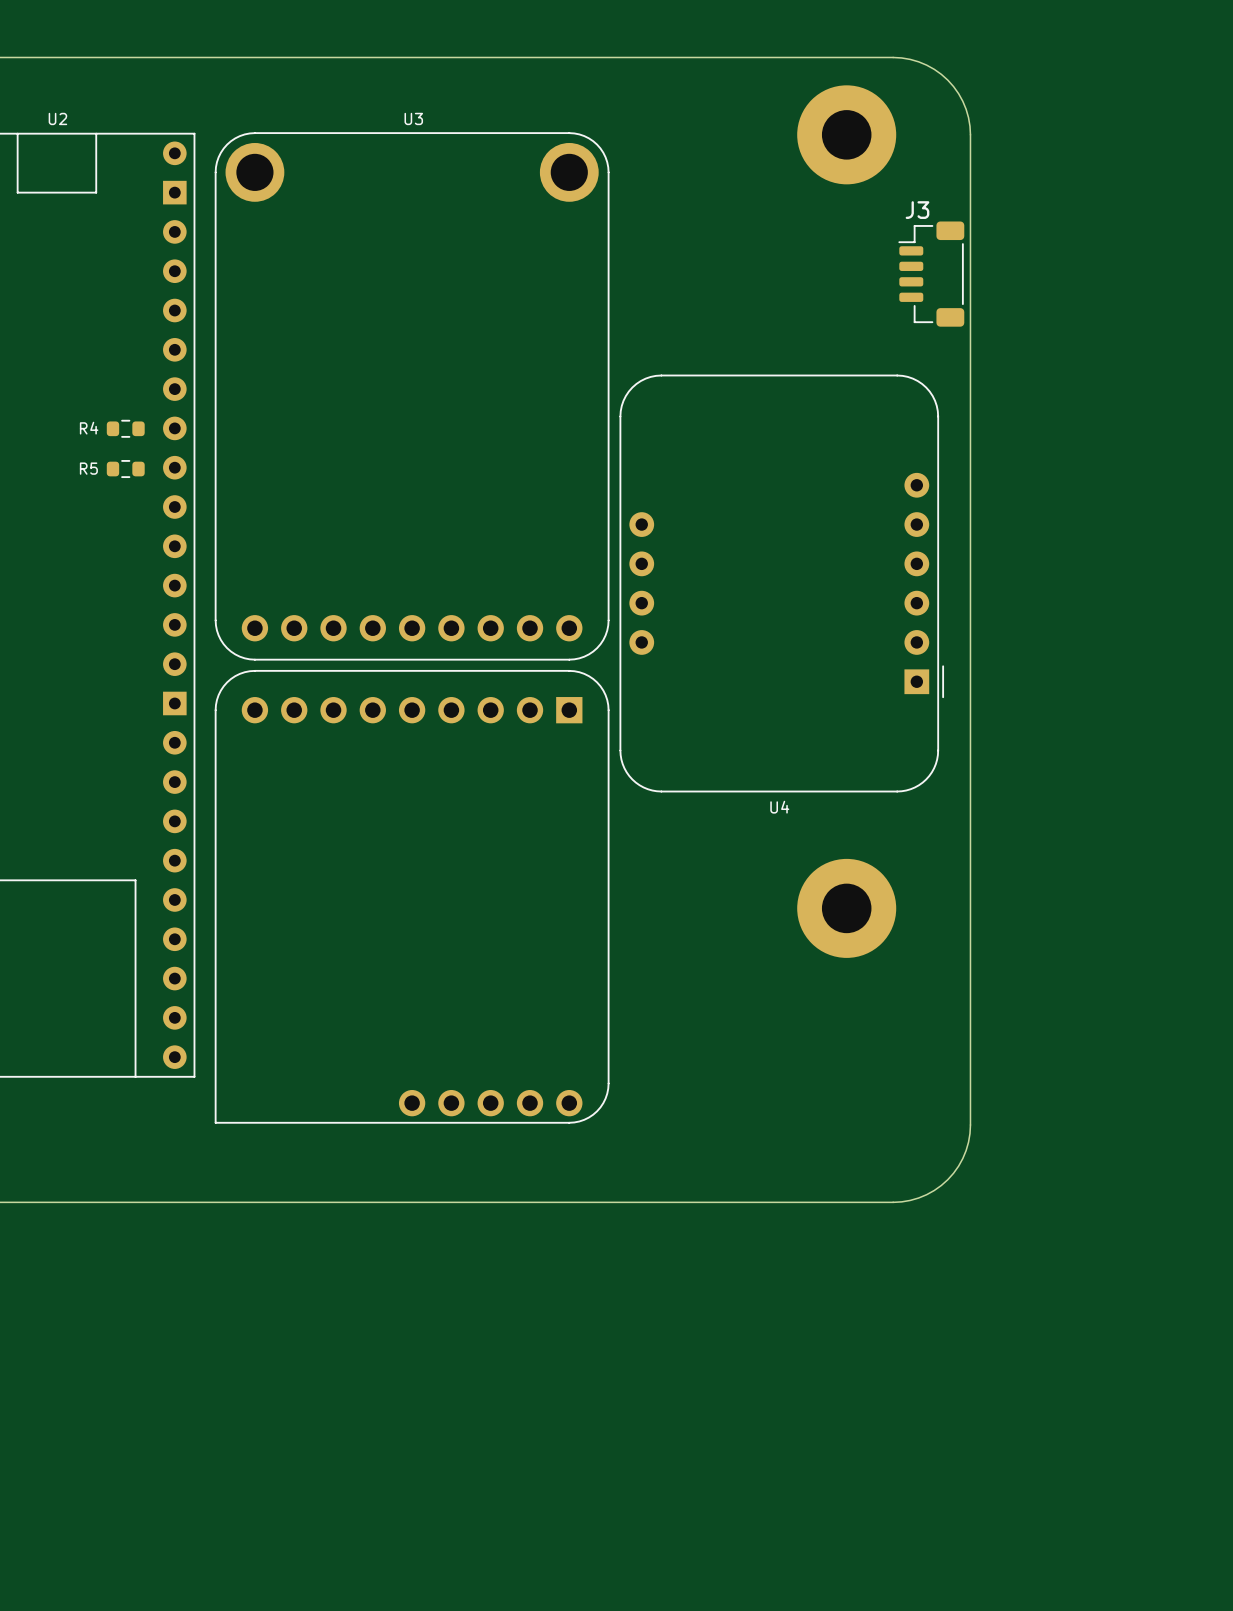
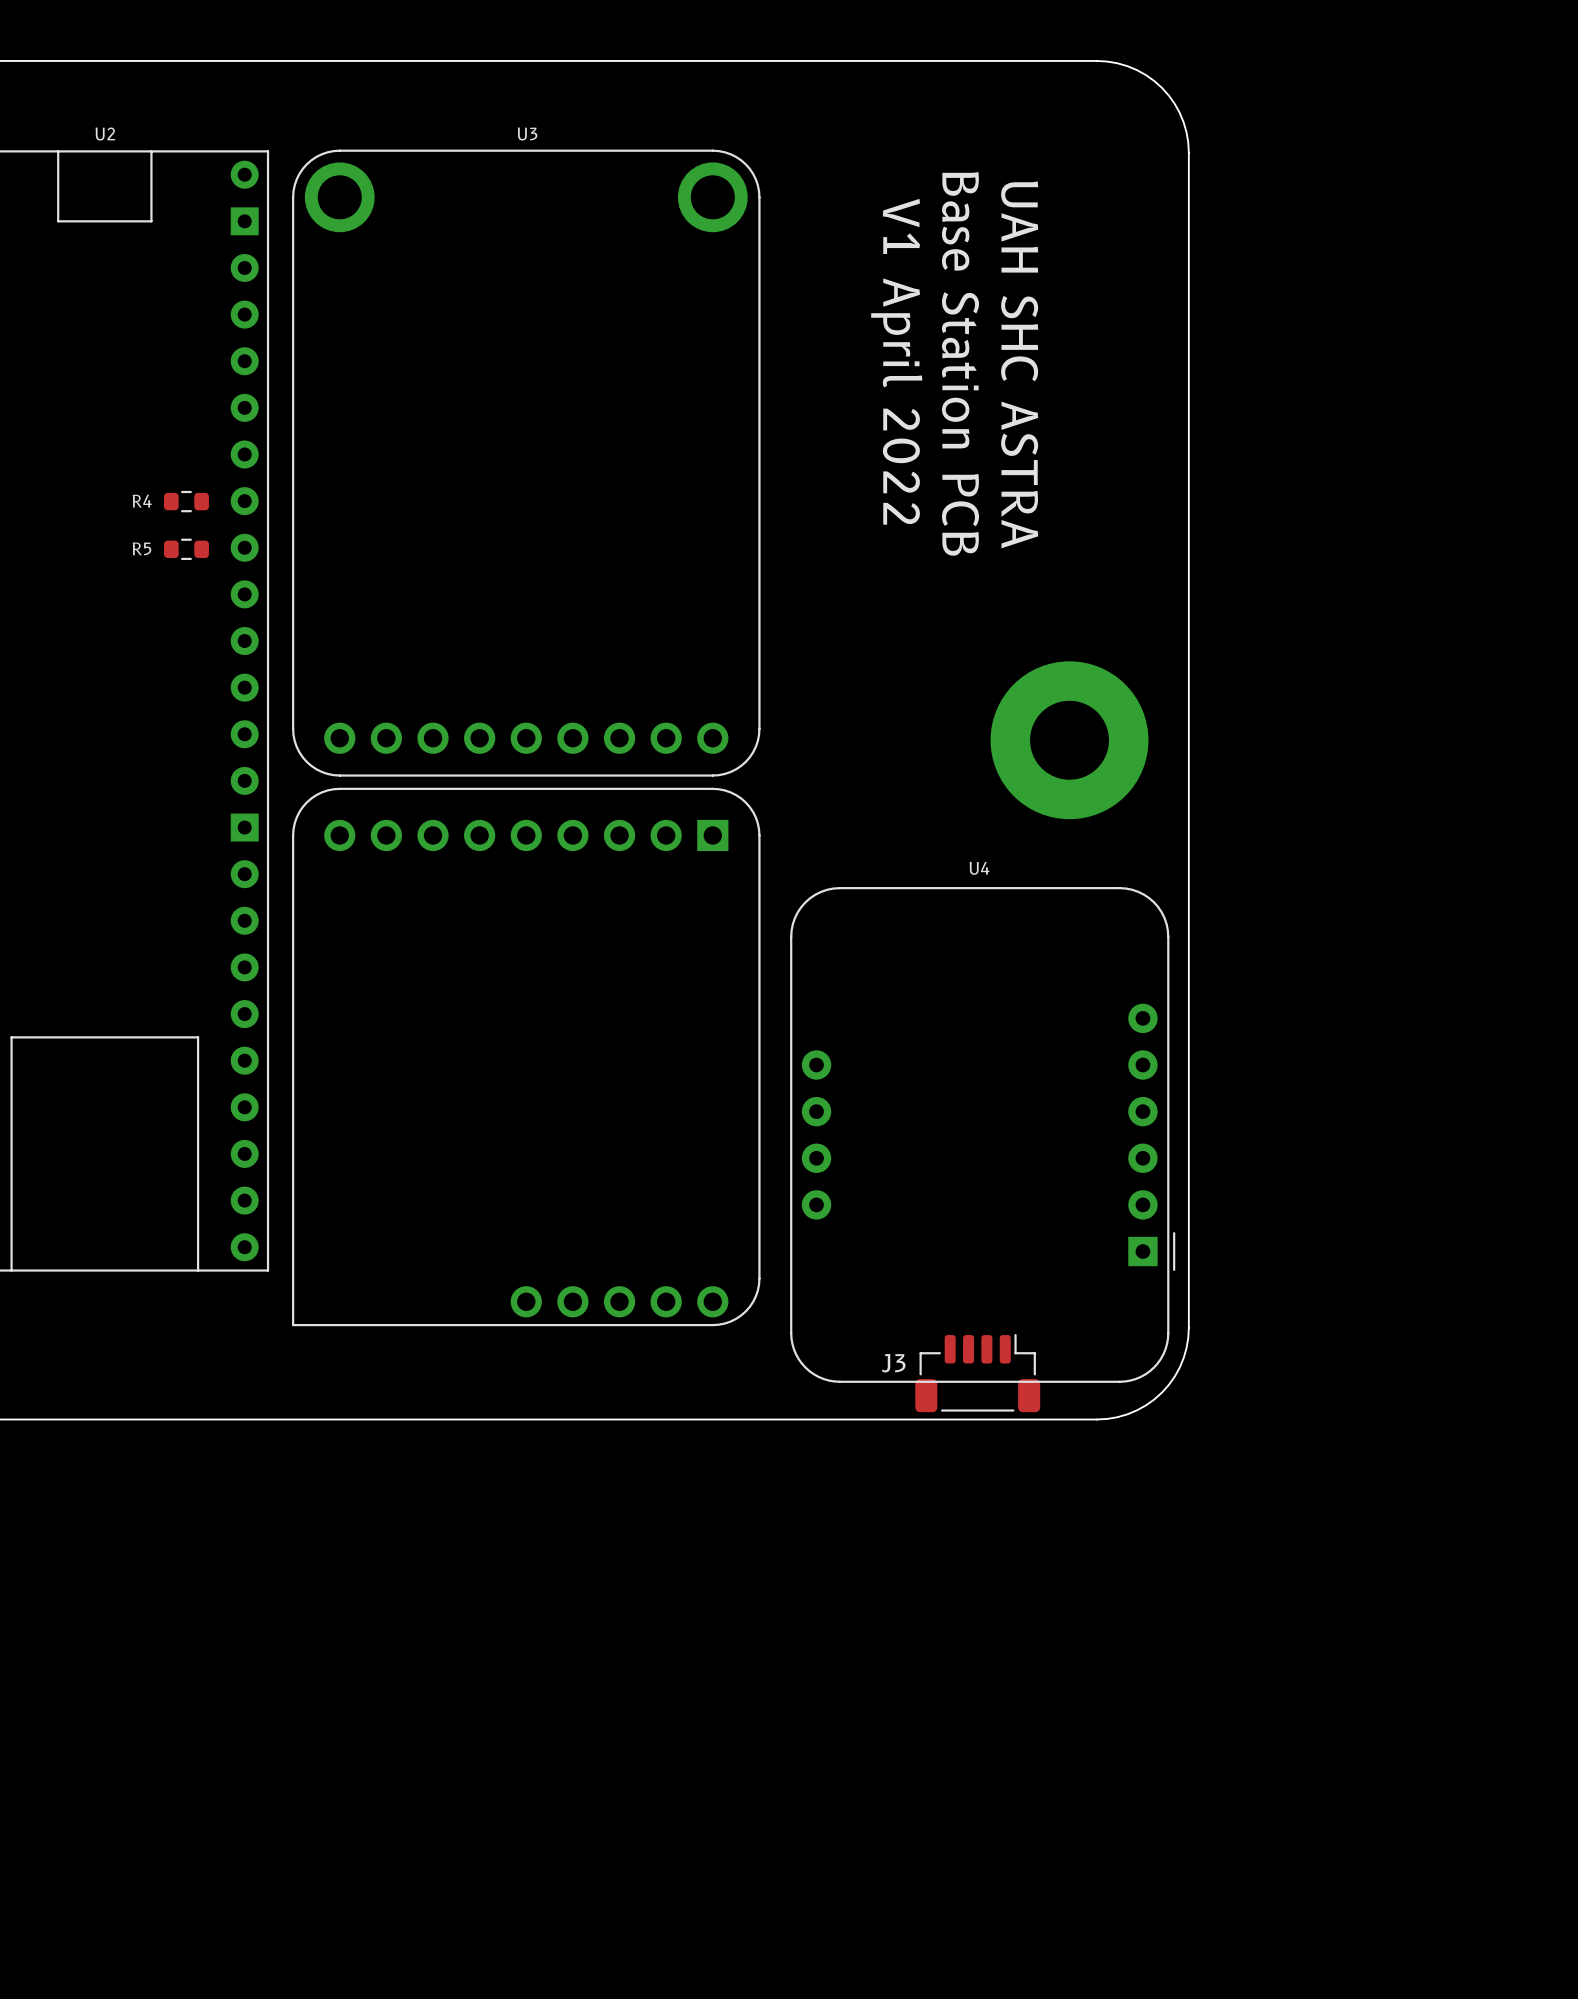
part: (846, 134) -> none
J3 name position: J3 (917, 210) -> J3 (893, 1363)
J3 rotation: 0° (931, 274) -> 90° clockwise (977, 1373)
J3 position: (931, 274) -> (977, 1373)
text: none -> V1 April 2022 (896, 361)
text: none -> Base Station PCB (960, 363)
text: none -> UAH SHC ASTRA (1019, 364)
U4 position: (781, 583) -> (982, 1134)
part: none -> (1069, 740)
U4 name position: U4 (779, 807) -> U4 (979, 868)
part: (846, 908) -> none

